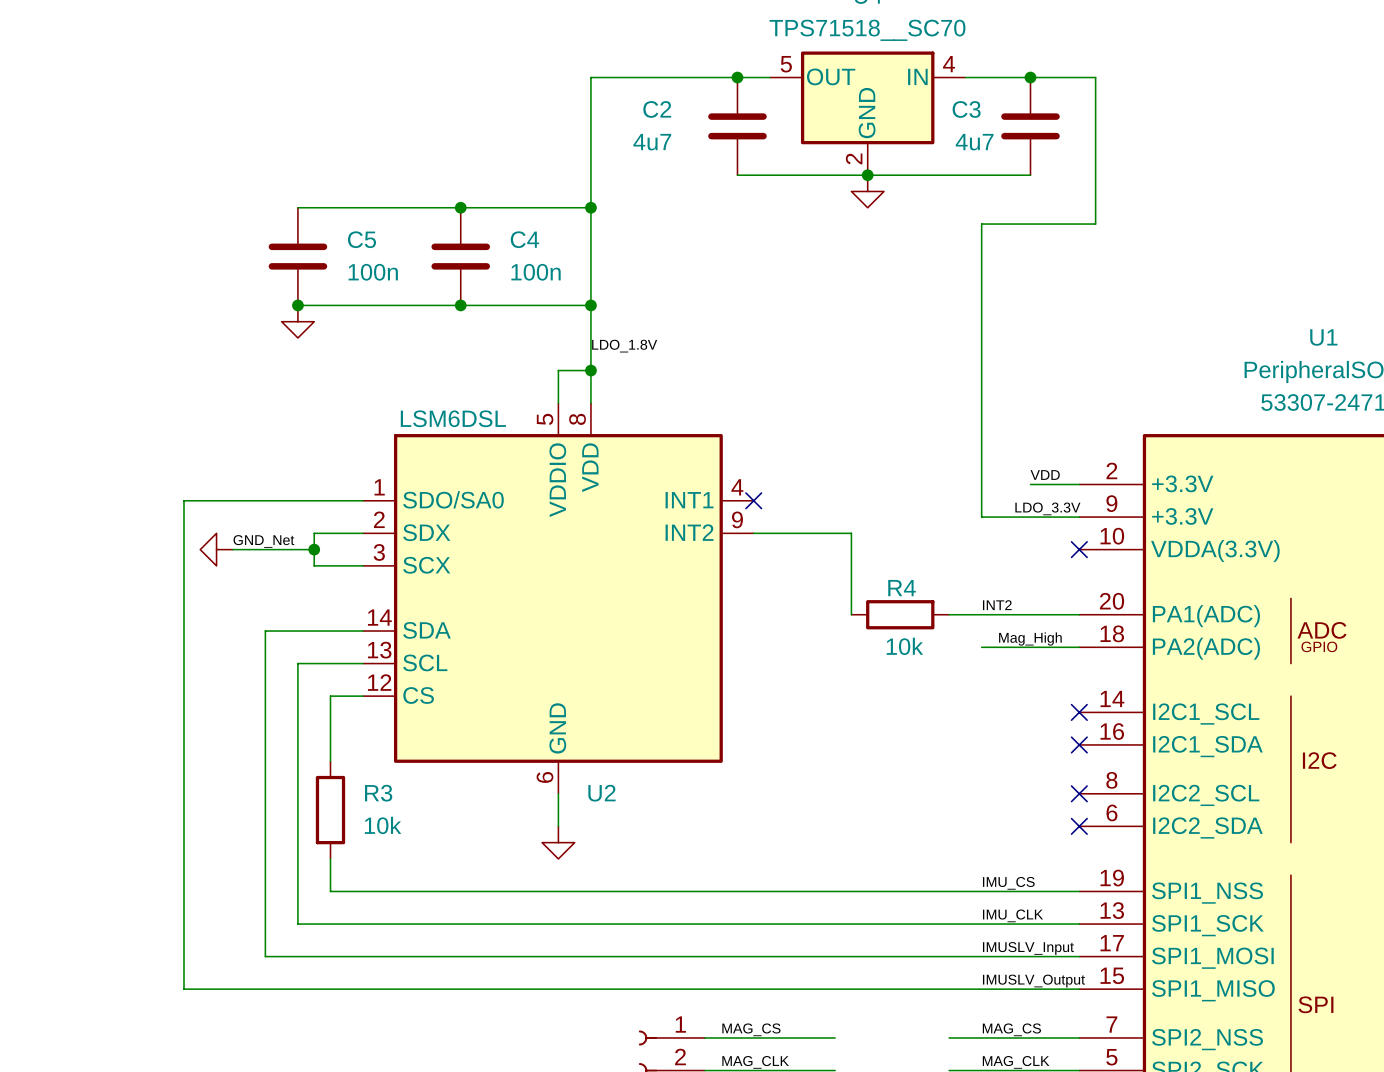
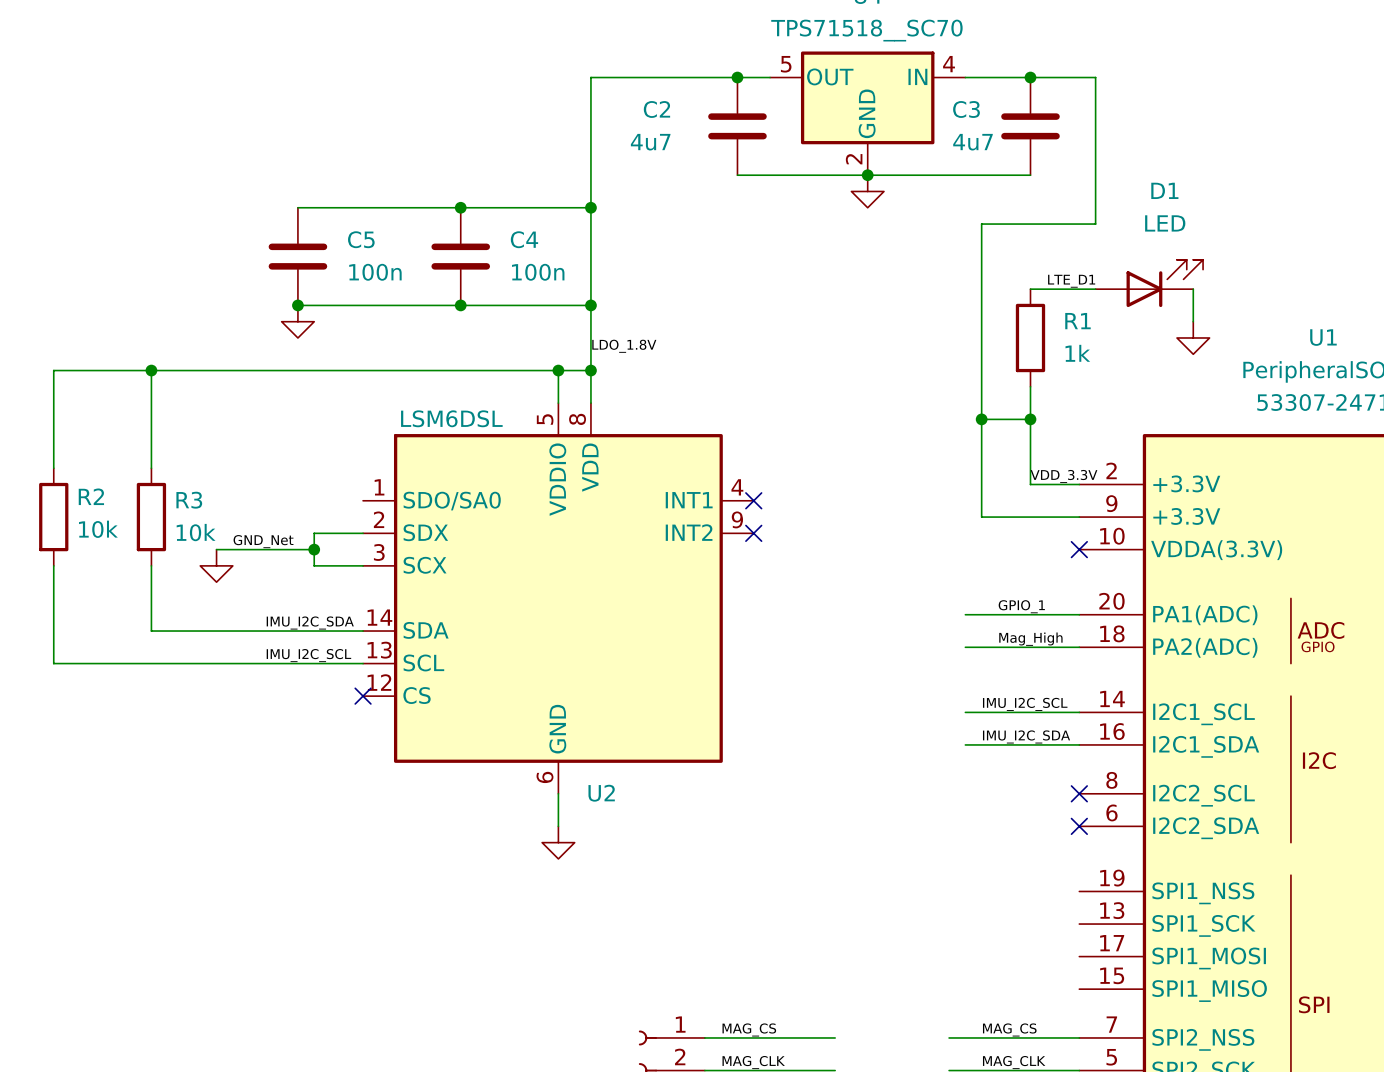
label: none -> LTE_D1 (1071, 281)
D1: none -> LED (1149, 283)
wire: none -> (1030, 289) (1095, 289)
wire: none -> (1193, 289) (1193, 321)
R1: none -> 1k (1030, 337)
power symbol: none -> (1193, 337)
wire: none -> (151, 370) (151, 468)
junction: none -> (151, 370)
wire: none -> (558, 370) (53, 370) (53, 468)
junction: none -> (558, 370)
wire: none -> (1030, 386) (1030, 484)
wire: none -> (981, 419) (1030, 419)
junction: none -> (981, 419)
junction: none -> (1030, 419)
label: VDD (1045, 475) -> VDD_3.3V (1063, 476)
wire: (363, 500) (183, 500) (183, 989) (1079, 989) -> none
label: LDO_3.3V (1047, 508) -> none
R2: none -> 10k (53, 517)
wire: (753, 533) (851, 533) (851, 614) -> none
no-connect mark: none -> (753, 533)
power symbol rotation: 0° (216, 549) -> 90° counterclockwise (216, 565)
label: INT2 (997, 605) -> none
label: none -> GPIO_1 (1021, 606)
R4: 10k (900, 614) -> none
wire: (949, 614) (965, 614) -> (965, 647) (981, 647)
label: none -> IMU_I2C_SDA (310, 623)
wire: (265, 631) (265, 956) (1079, 956) -> (265, 631) (151, 631) (151, 565)
label: none -> IMU_I2C_SCL (308, 655)
wire: (297, 663) (297, 924) (1079, 924) -> (297, 663) (53, 663) (53, 565)
wire: (363, 696) (330, 696) (330, 761) -> none
no-connect mark: none -> (363, 696)
label: none -> IMU_I2C_SCL (1025, 704)
wire: none -> (965, 712) (1079, 712)
no-connect mark: (1079, 712) -> none
label: none -> IMU_I2C_SDA (1026, 736)
wire: none -> (965, 744) (1079, 744)
no-connect mark: (1079, 744) -> none
R3 name position: R3 (378, 793) -> R3 (189, 500)
R3 position: (330, 810) -> (151, 517)
R3 value position: 10k (383, 825) -> 10k (196, 532)
wire: (330, 858) (330, 891) (1079, 891) -> none
label: IMU_CS (1008, 883) -> none
label: IMU_CLK (1013, 915) -> none
label: IMUSLV_Input (1028, 948) -> none
label: IMUSLV_Output (1033, 981) -> none

